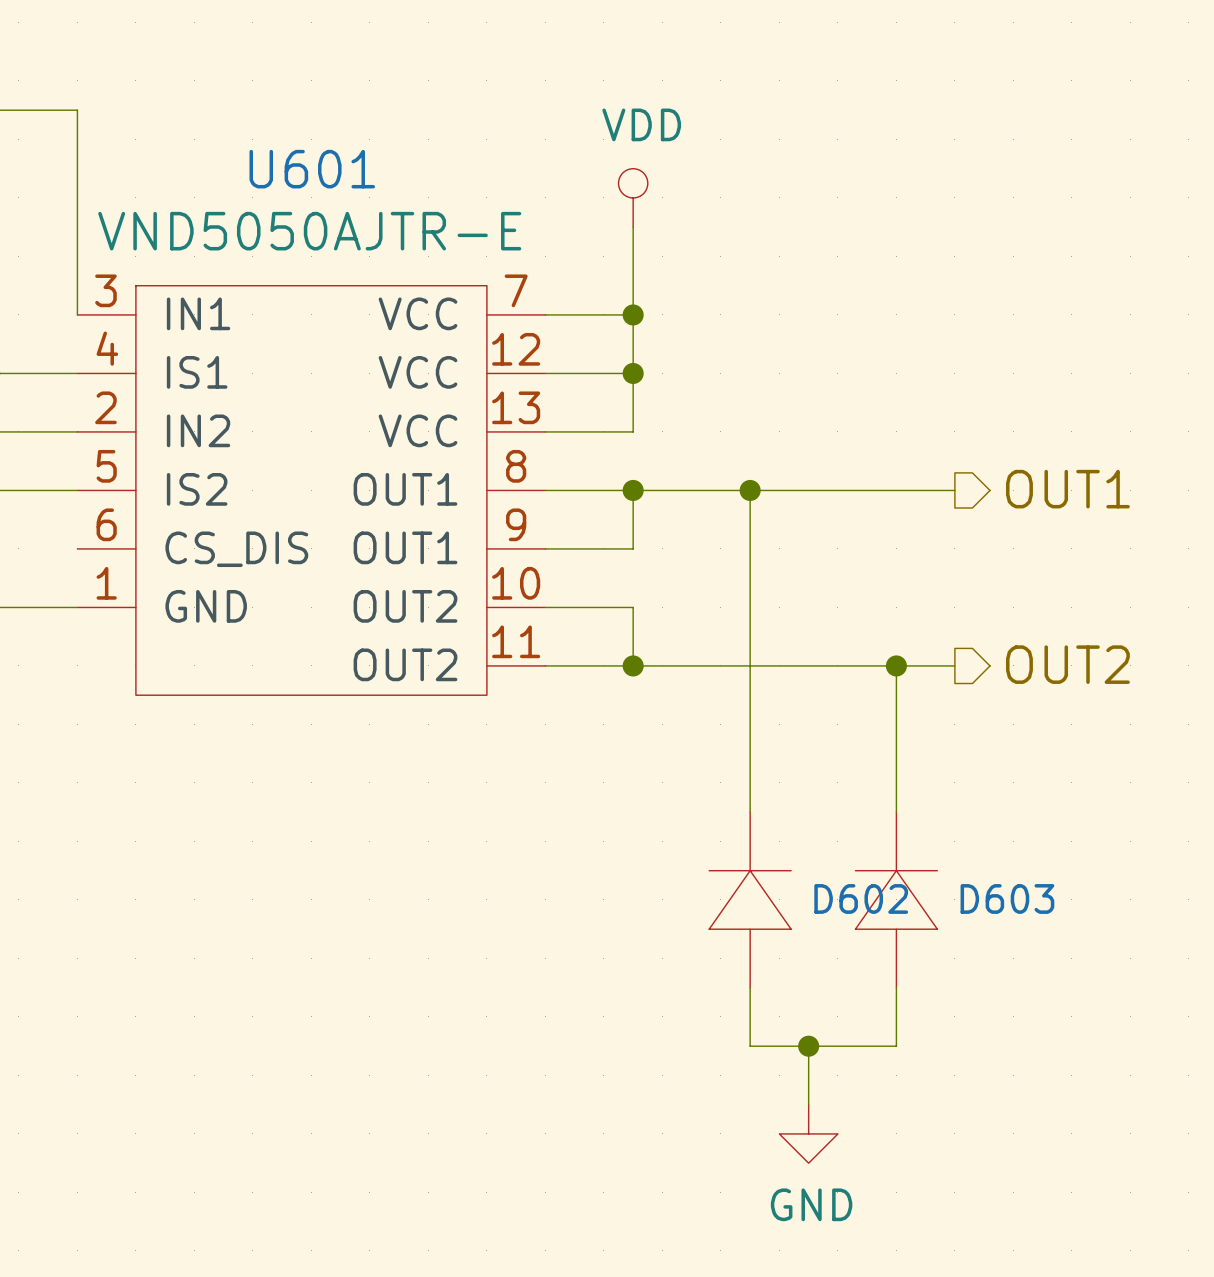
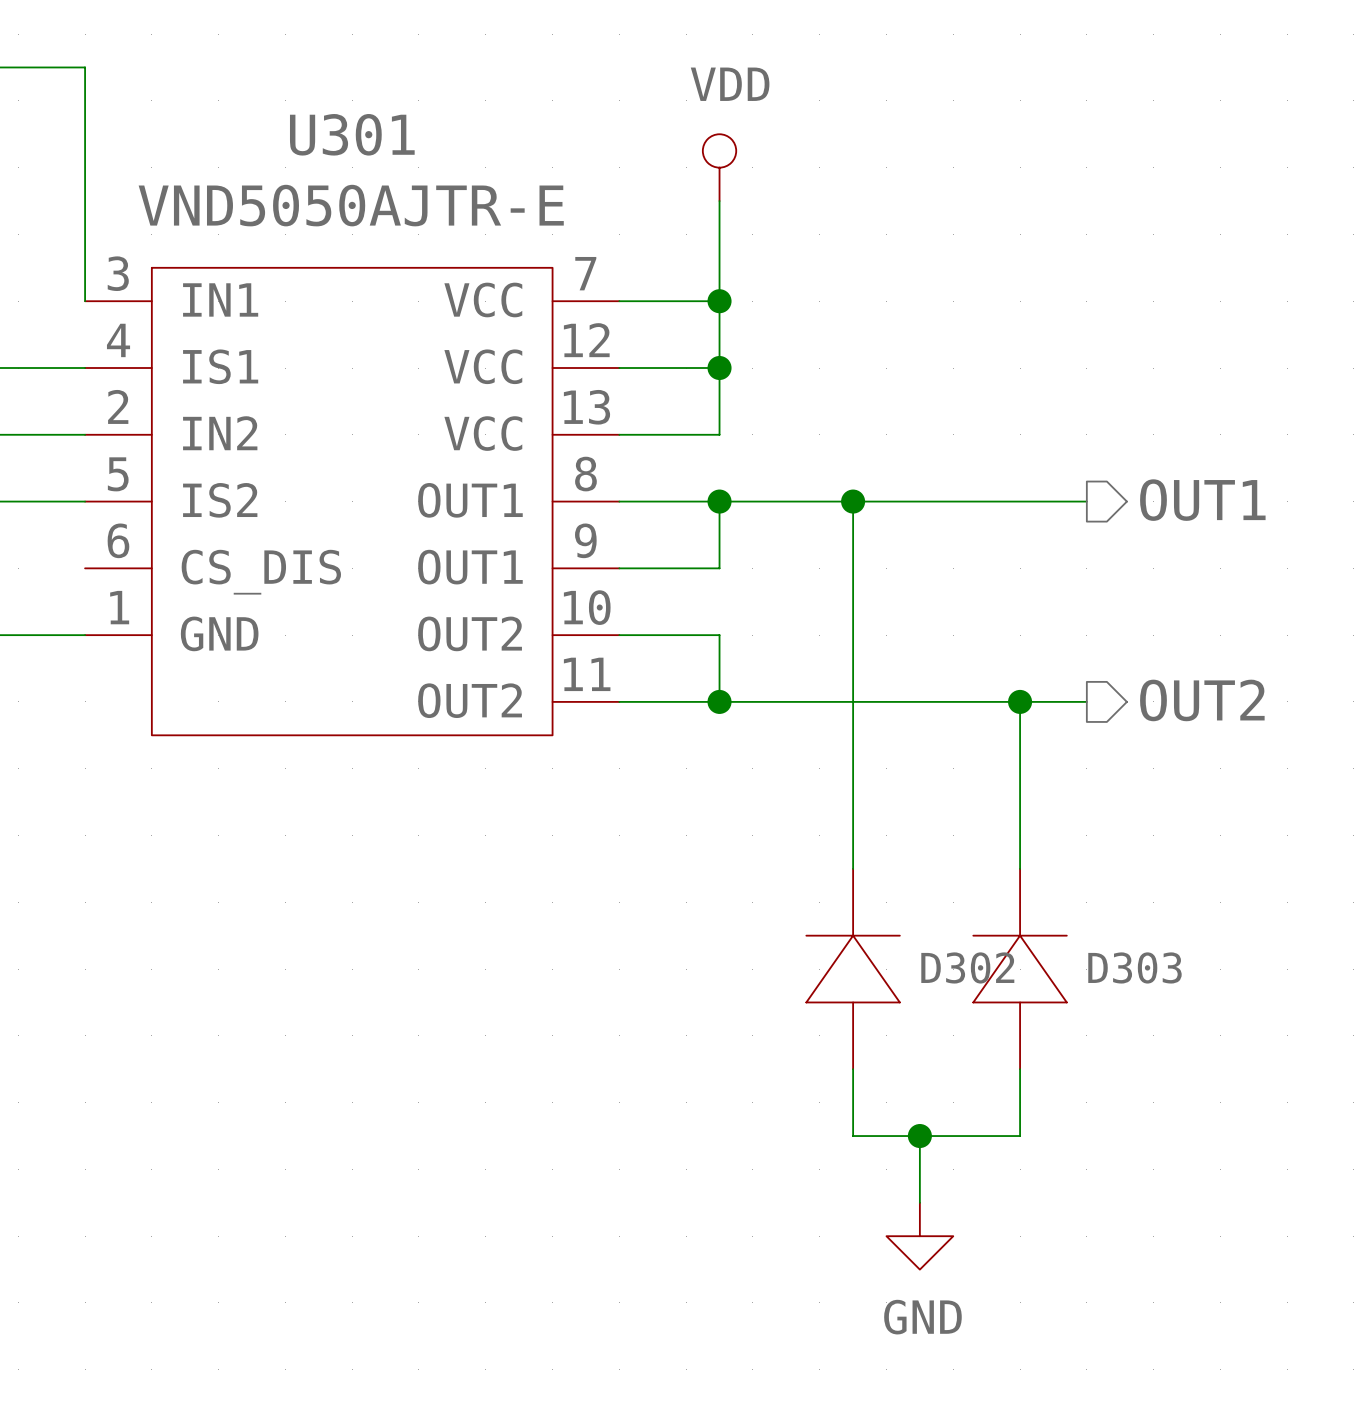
U601 name: U601 (312, 169) -> U301 (352, 134)
D602 name: D602 (861, 898) -> D302 (967, 967)
D603 name: D603 (1007, 898) -> D303 (1134, 967)

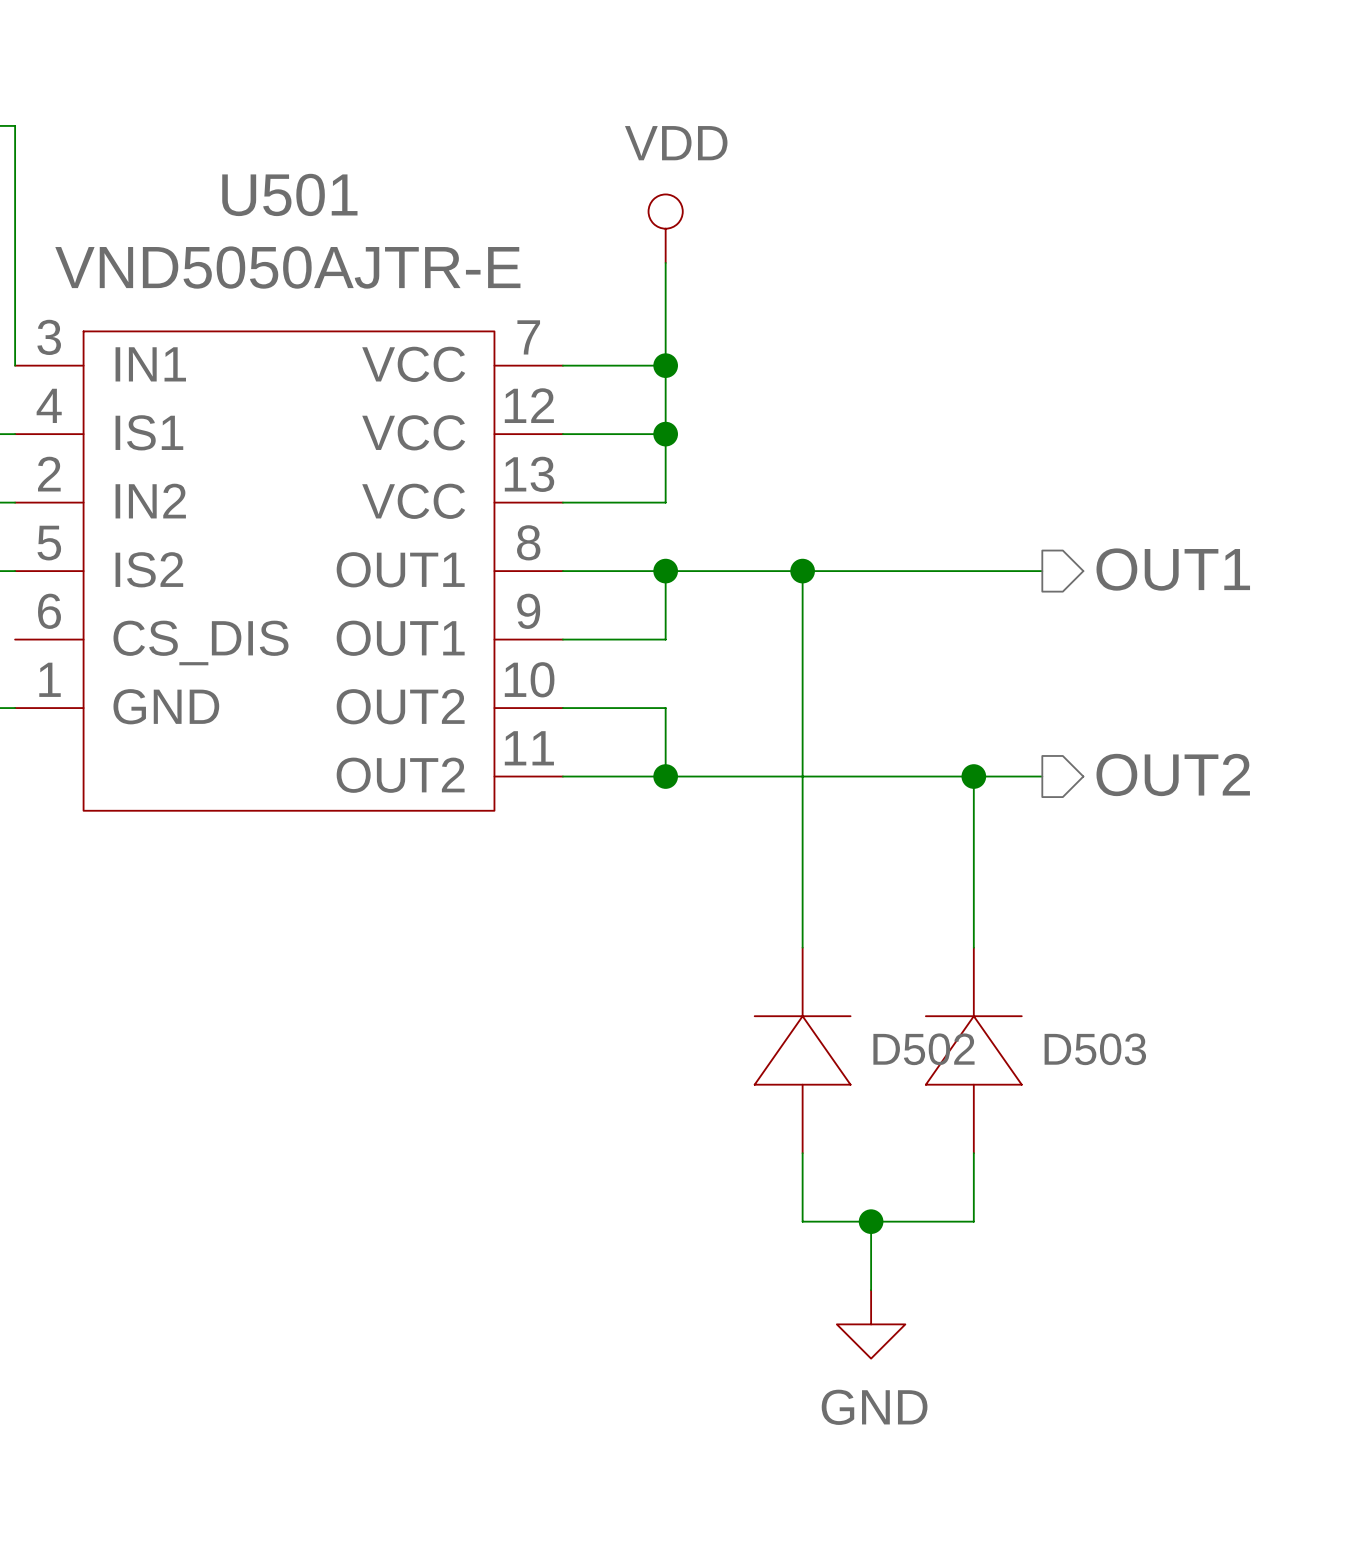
U301 name: U301 (352, 134) -> U501 (289, 194)
D302 name: D302 (967, 967) -> D502 (923, 1049)
D303 name: D303 (1134, 967) -> D503 (1095, 1049)

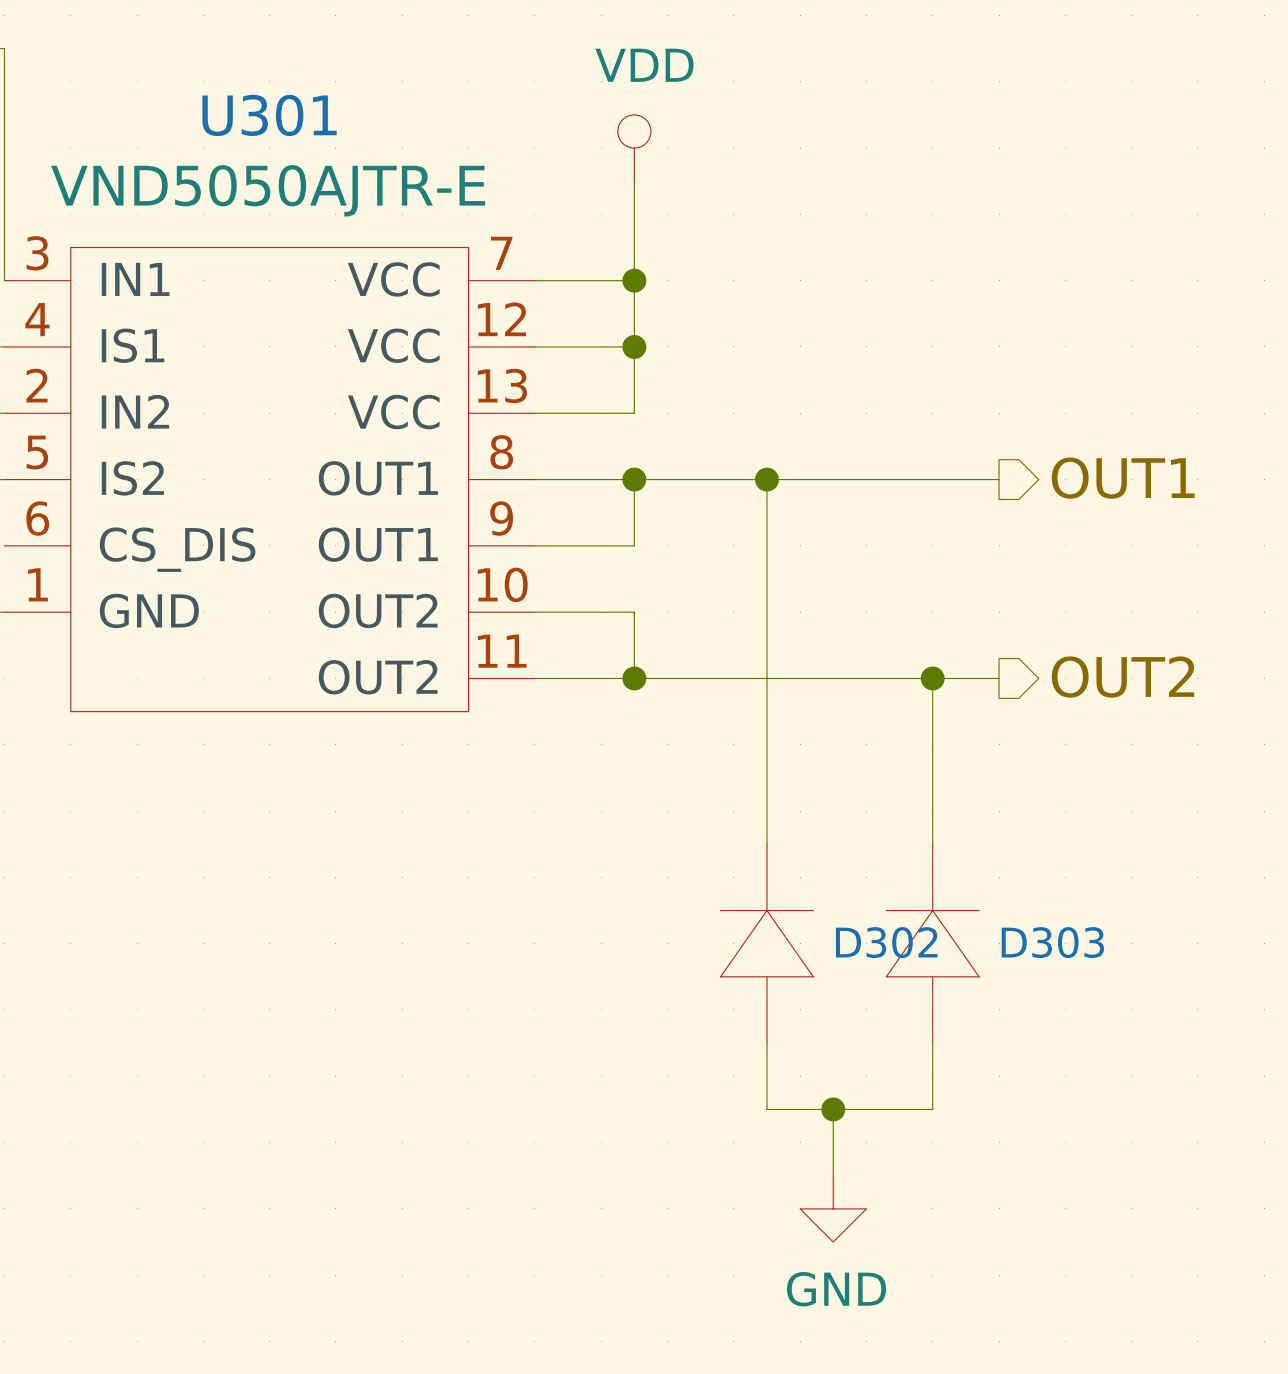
U501 name: U501 (289, 194) -> U301 (269, 115)
D502 name: D502 (923, 1049) -> D302 (886, 942)
D503 name: D503 (1095, 1049) -> D303 (1052, 942)

